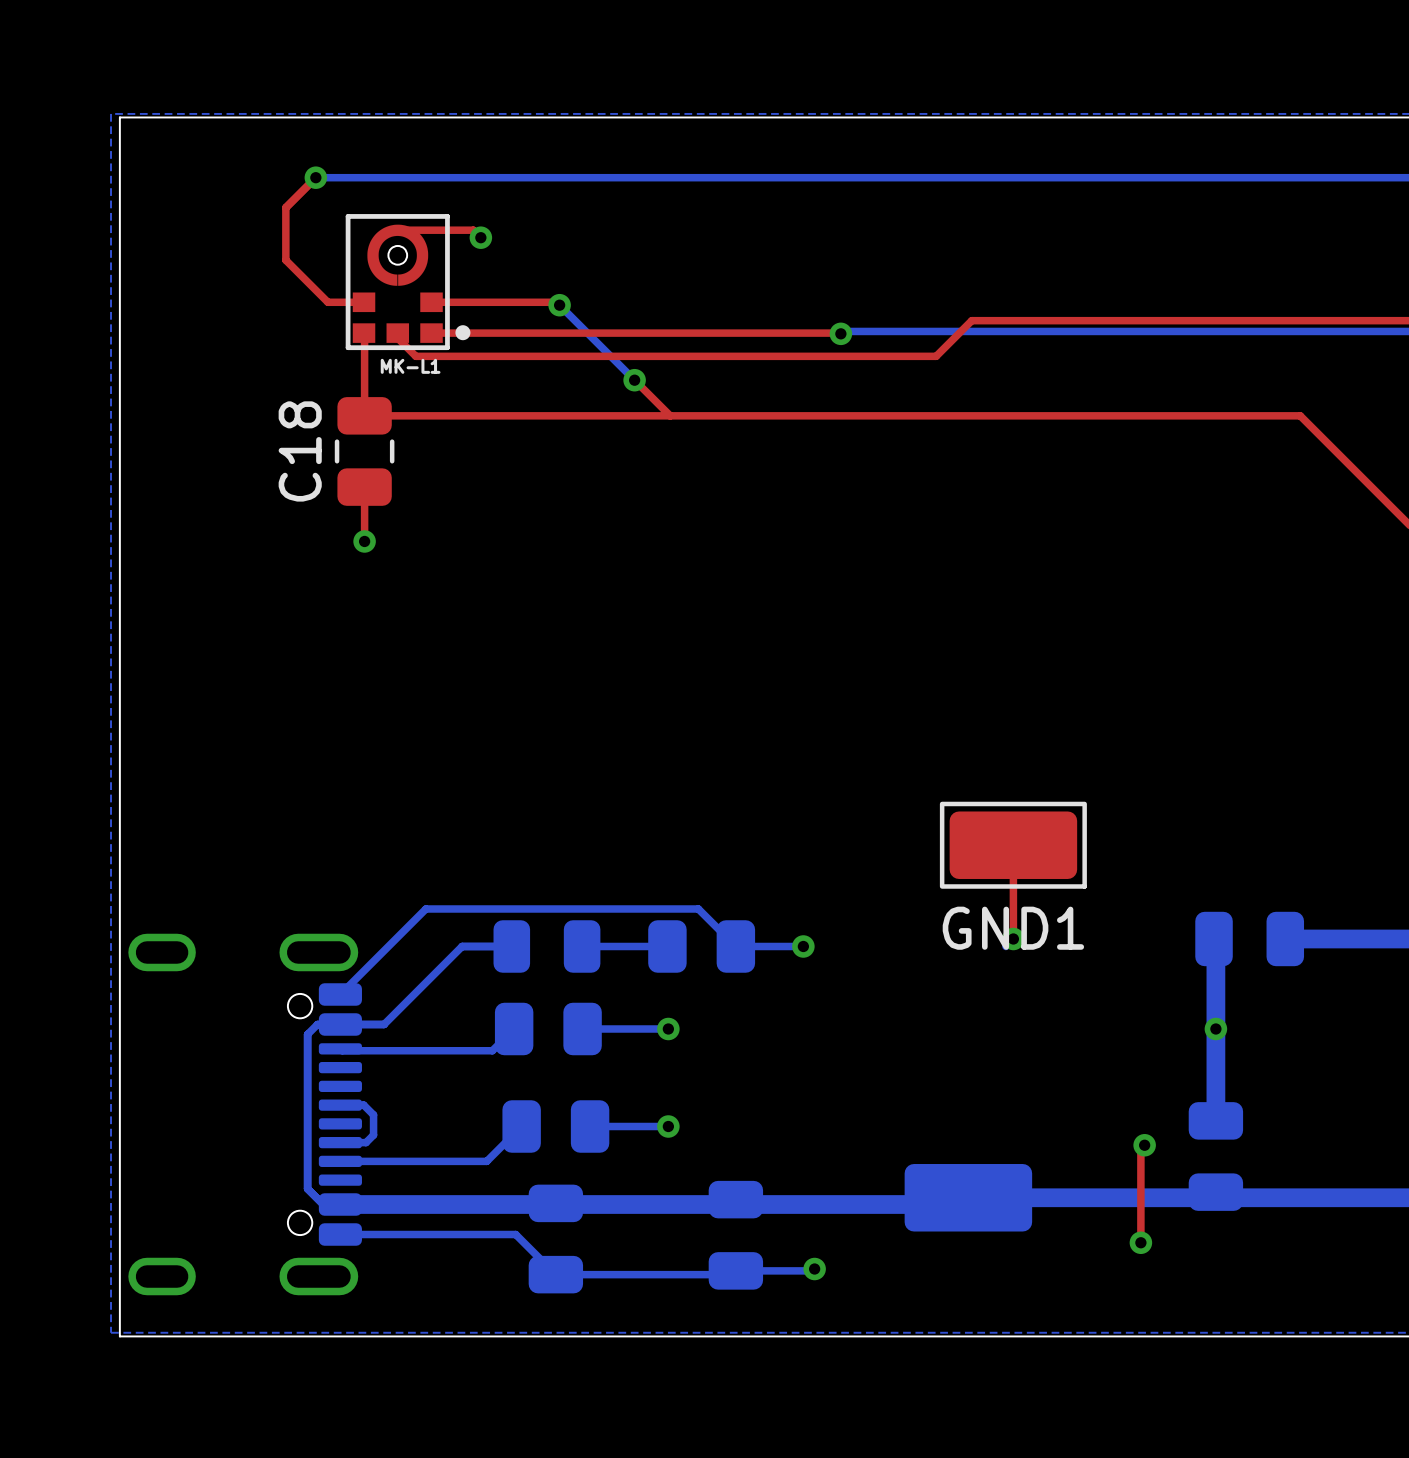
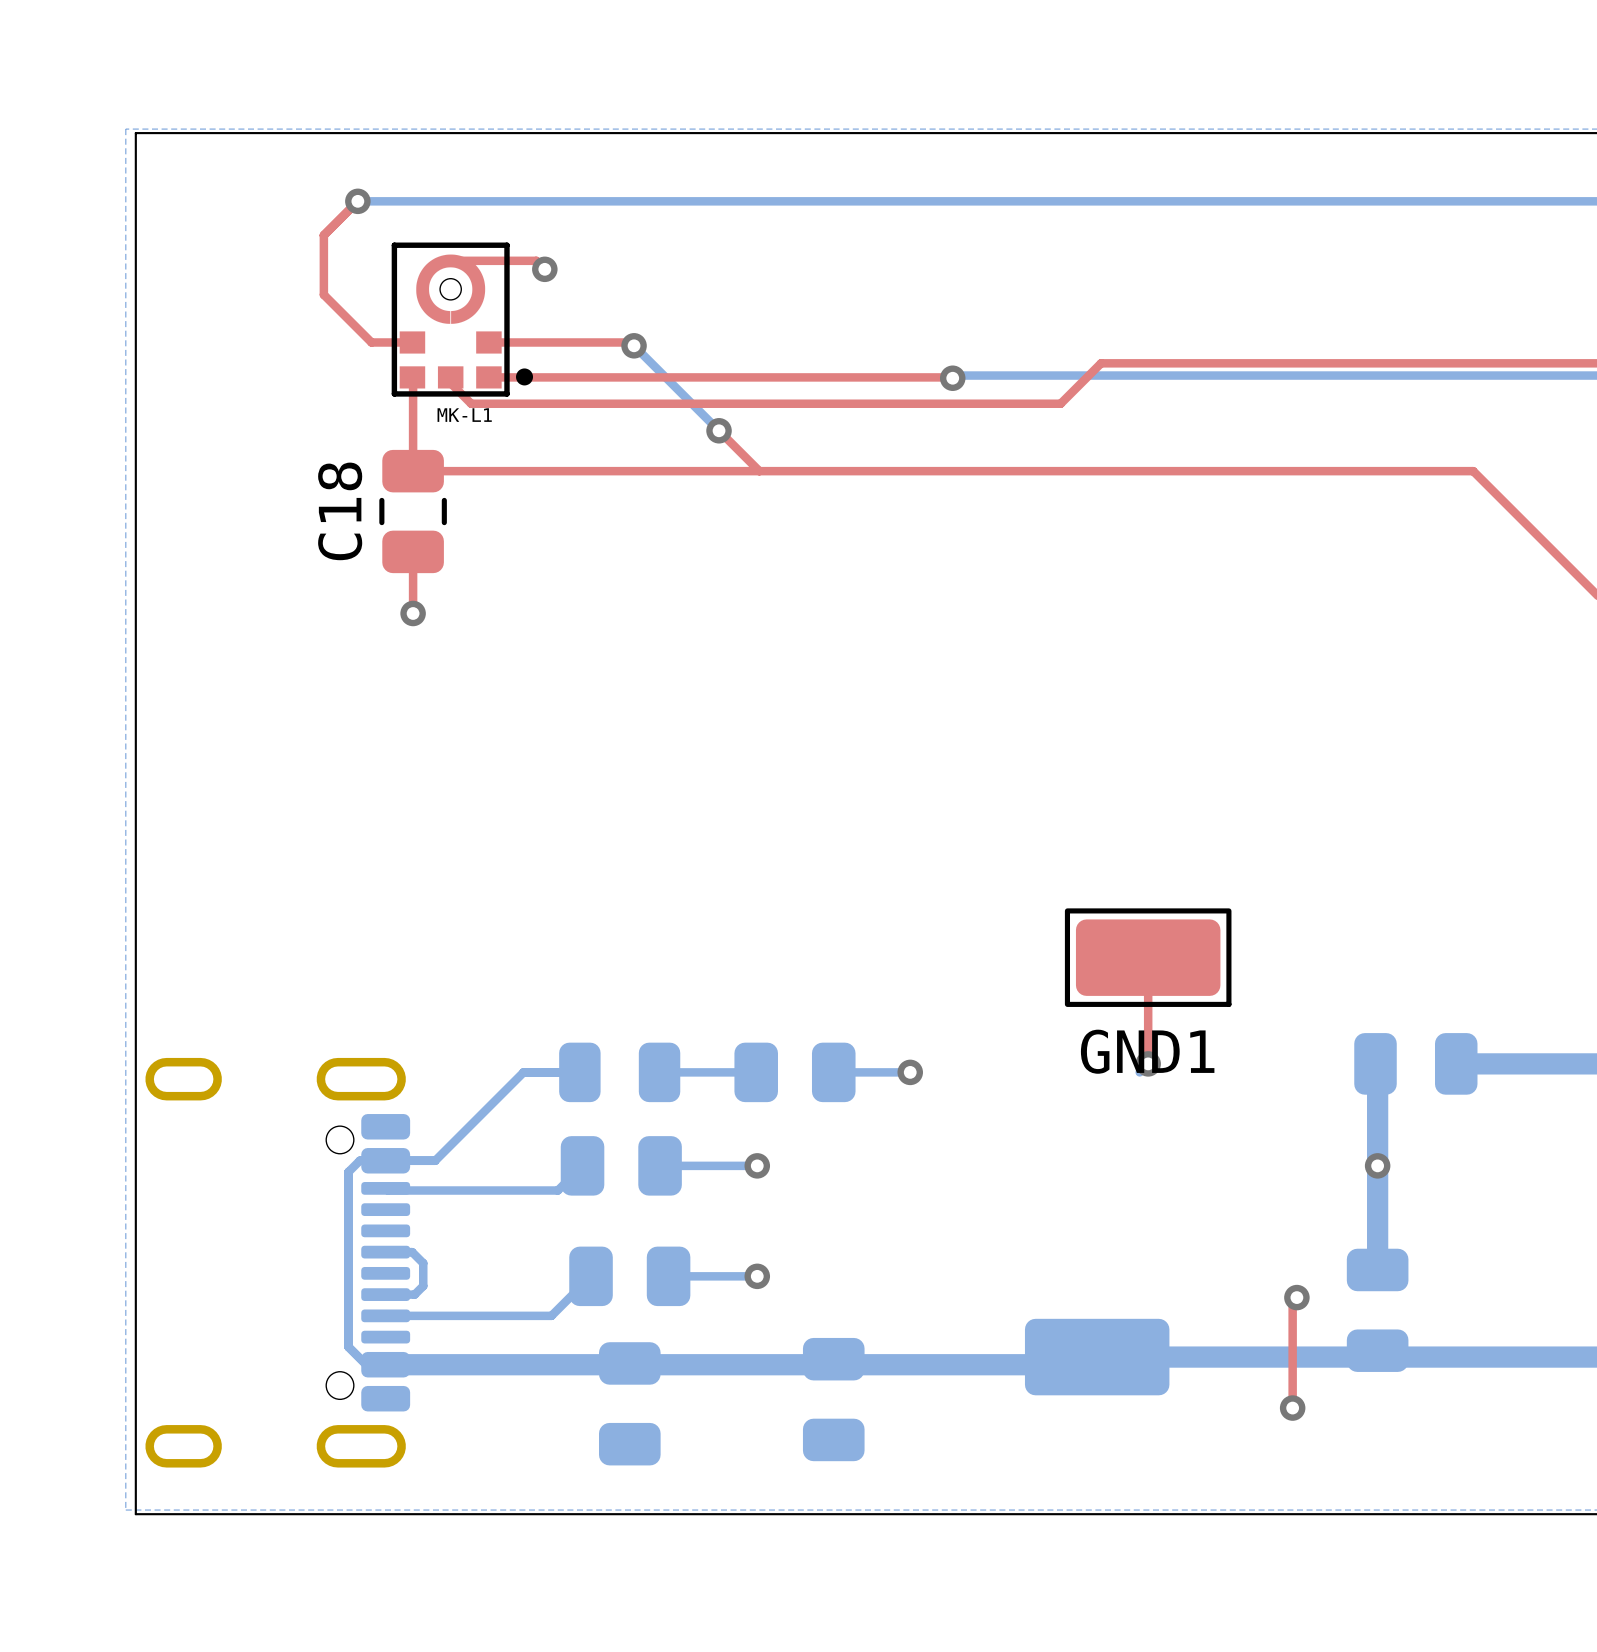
bottom track: (735, 946) (698, 908) (425, 908) (340, 994) -> none
bottom track: (340, 1234) (515, 1234) (555, 1274) (732, 1274) (735, 1270) (812, 1270) (814, 1269) -> none
via: (814, 1269) -> none

